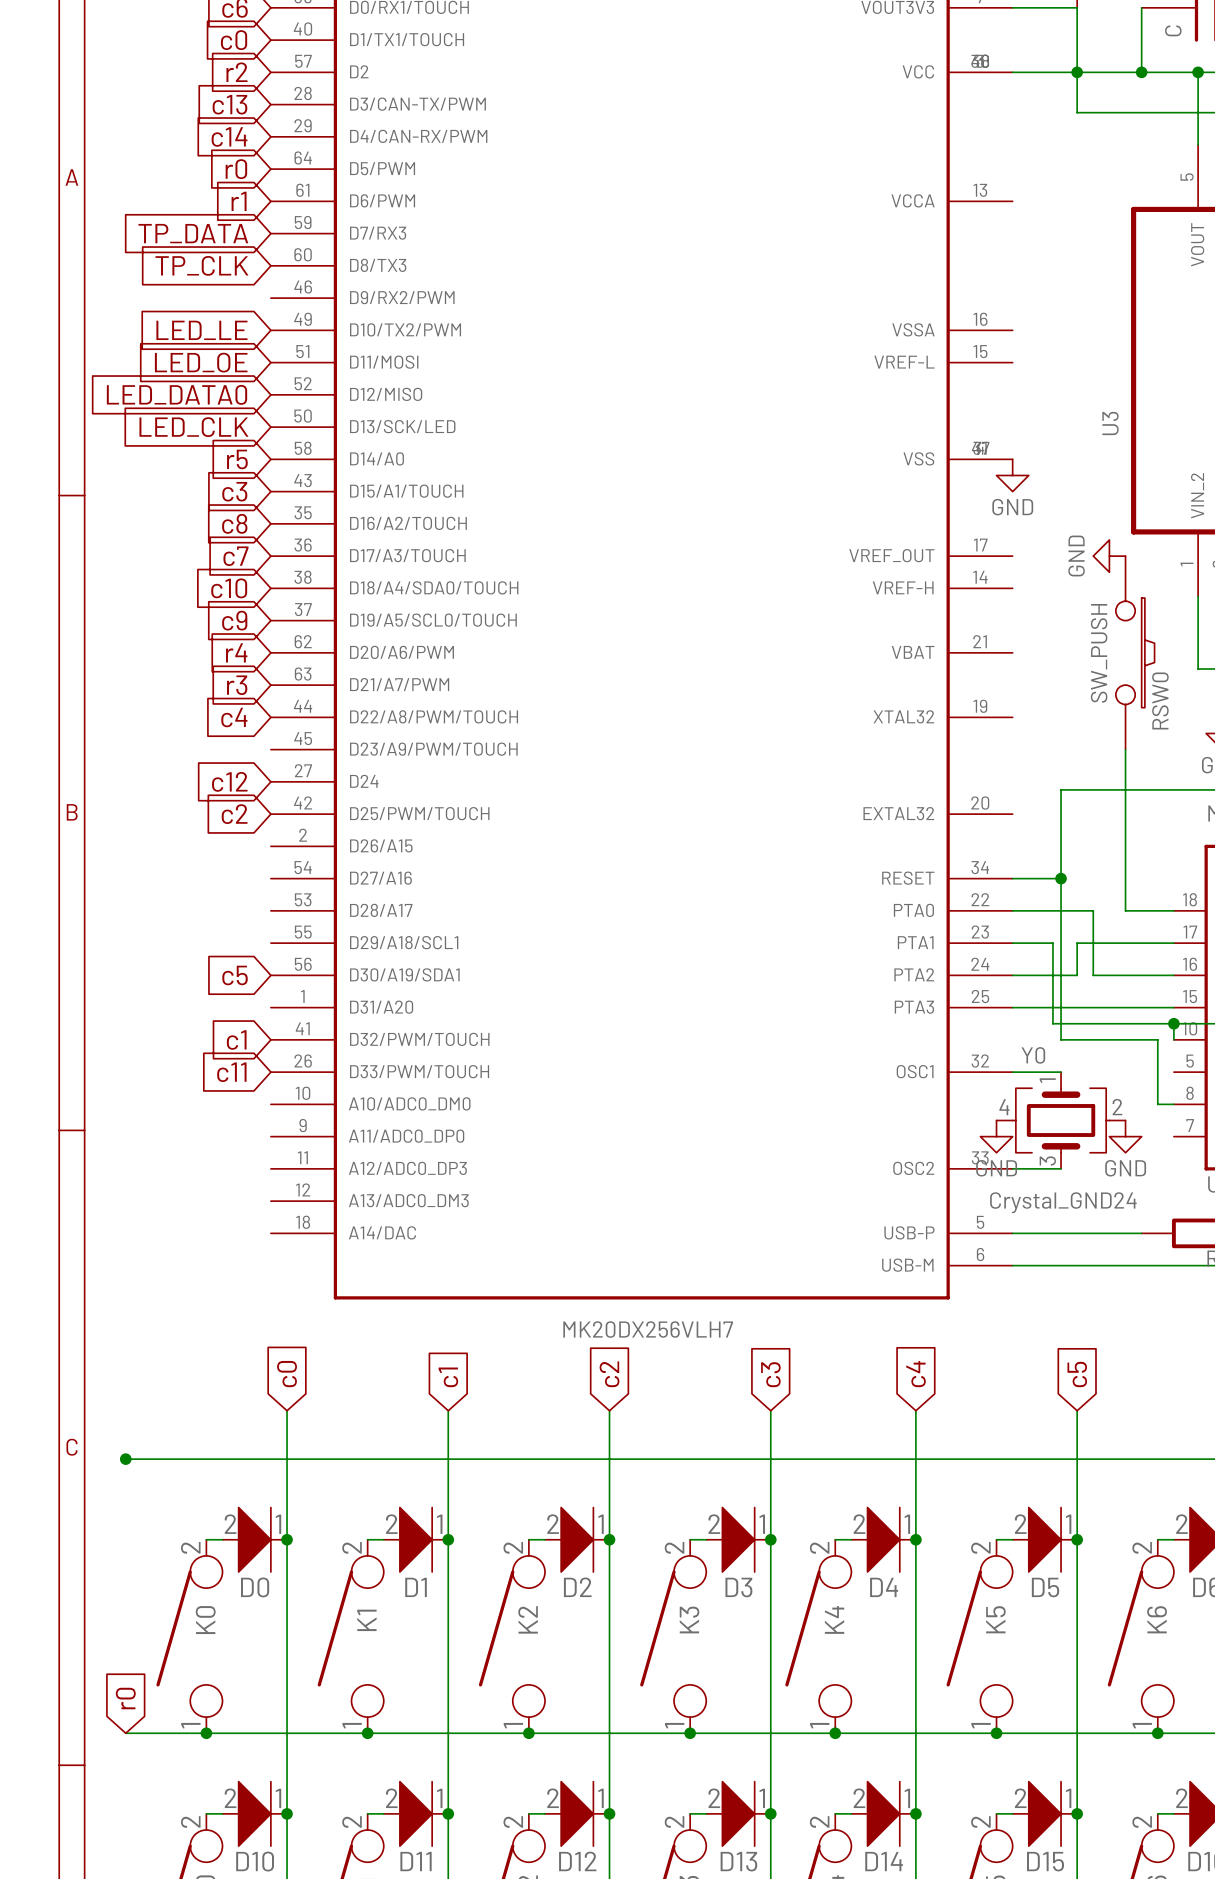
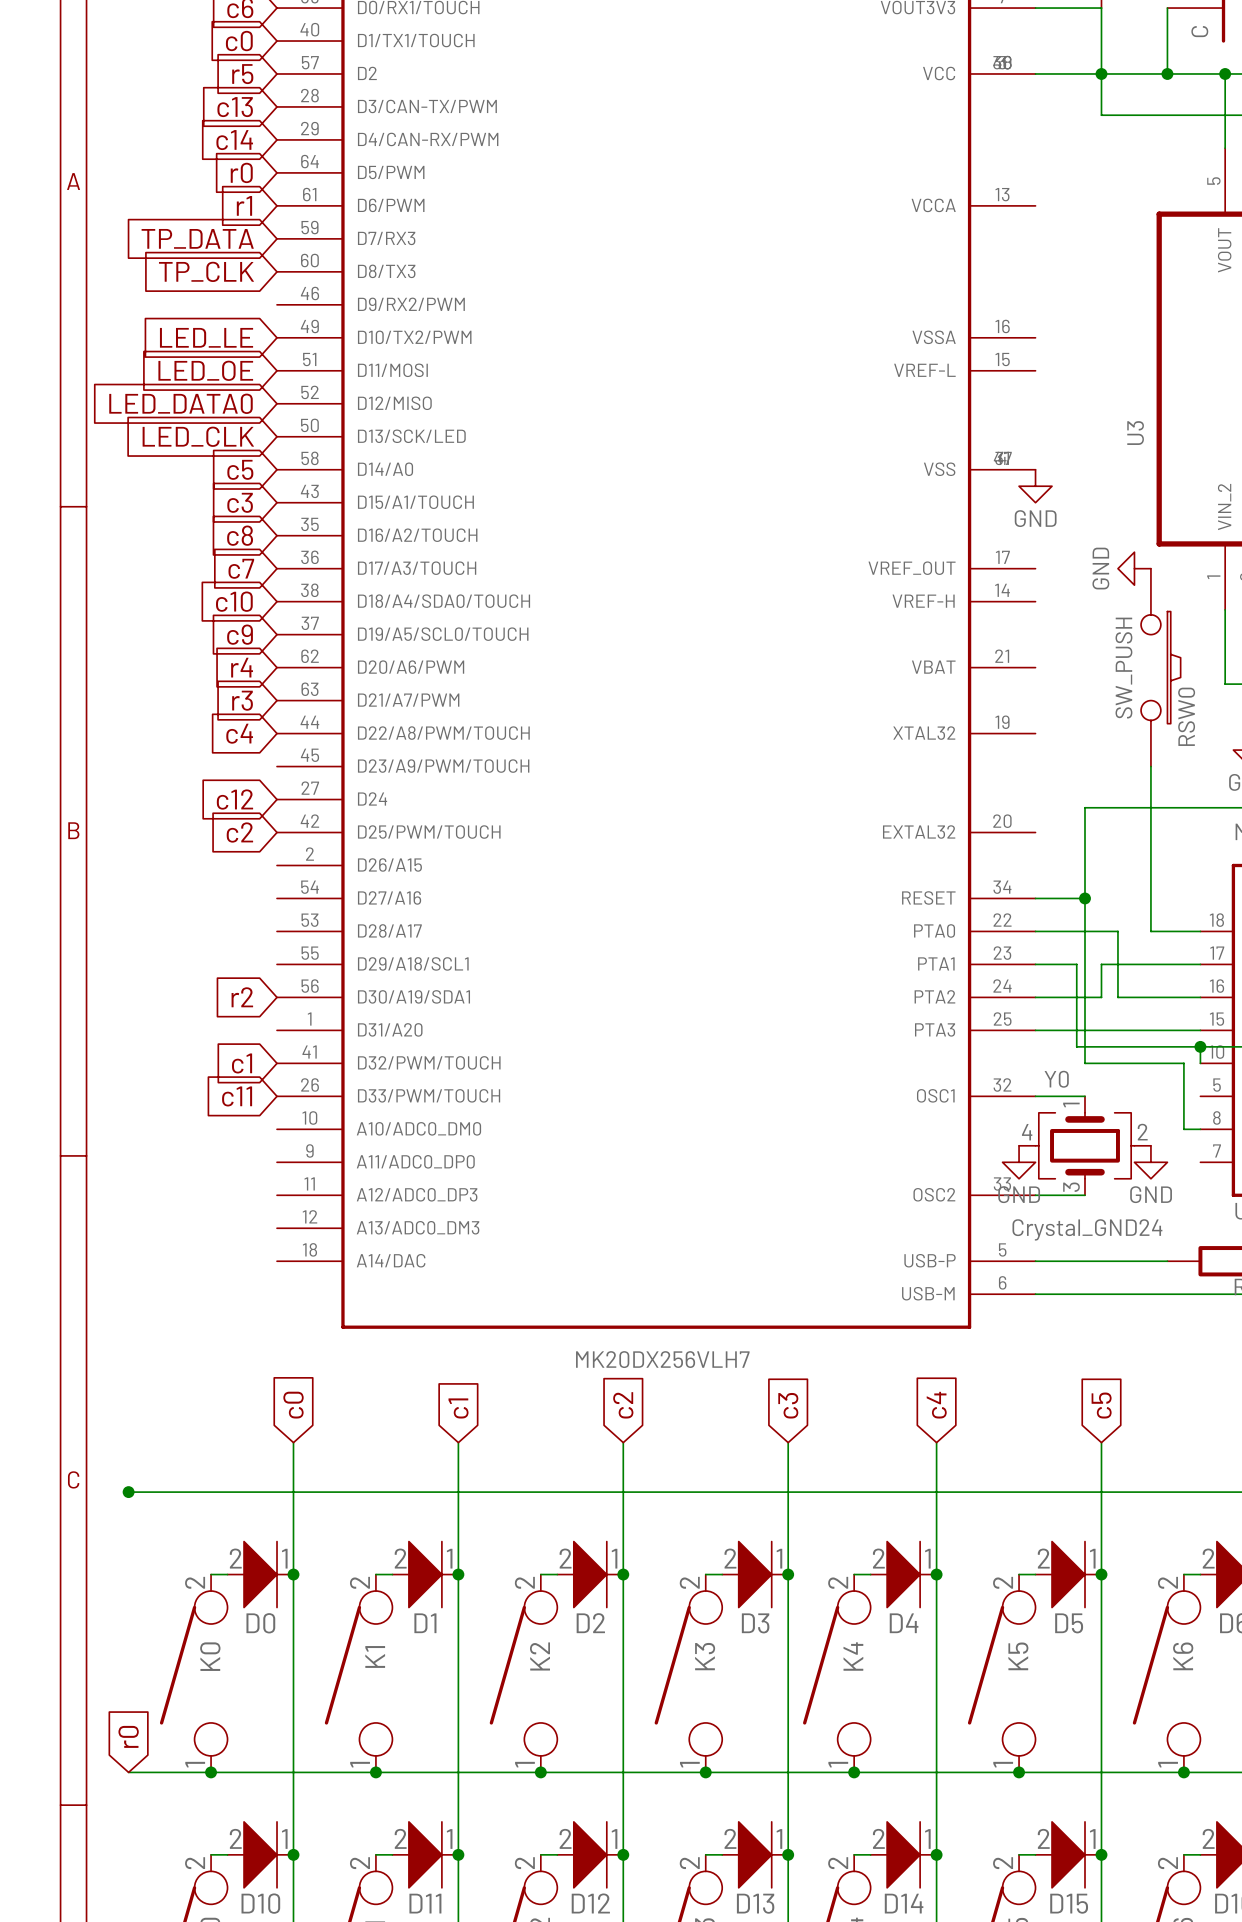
global label: r2 (236, 72) -> r5 (242, 74)
global label: r5 (237, 459) -> c5 (240, 469)
global label: c5 (235, 975) -> r2 (242, 997)

